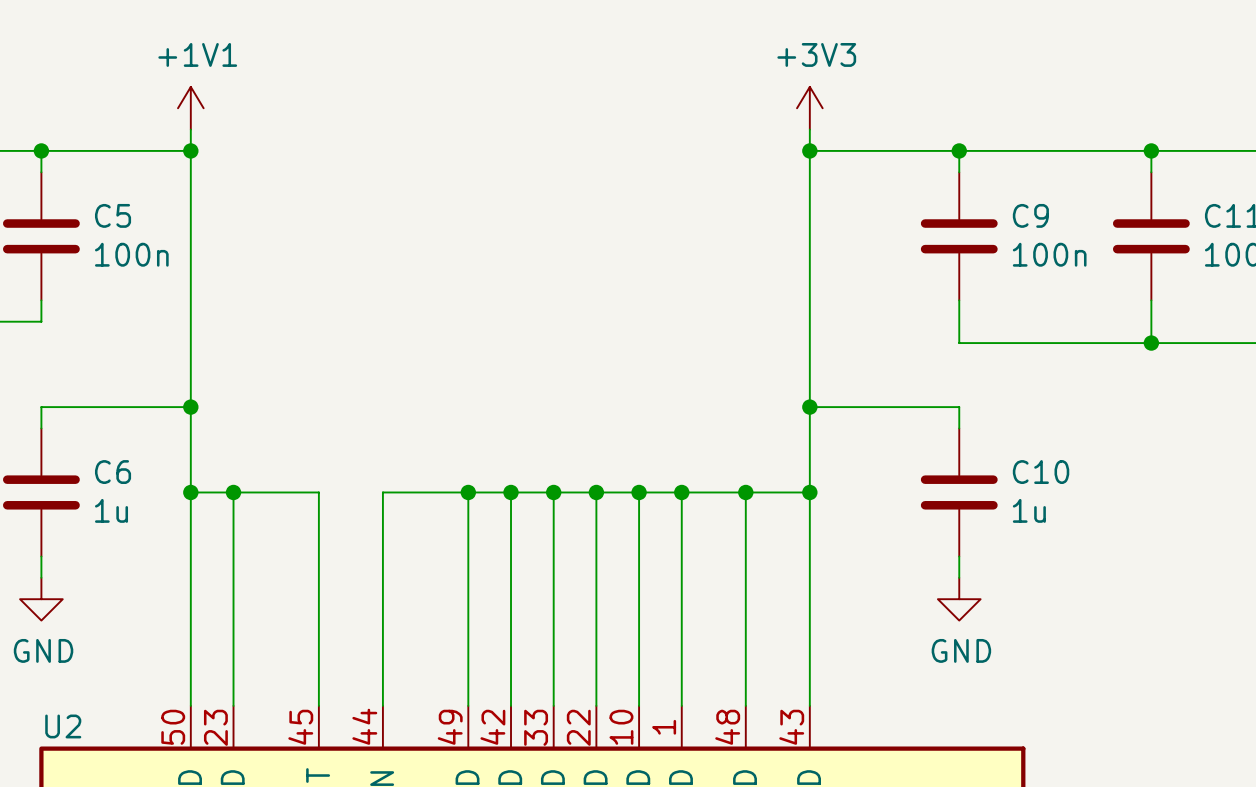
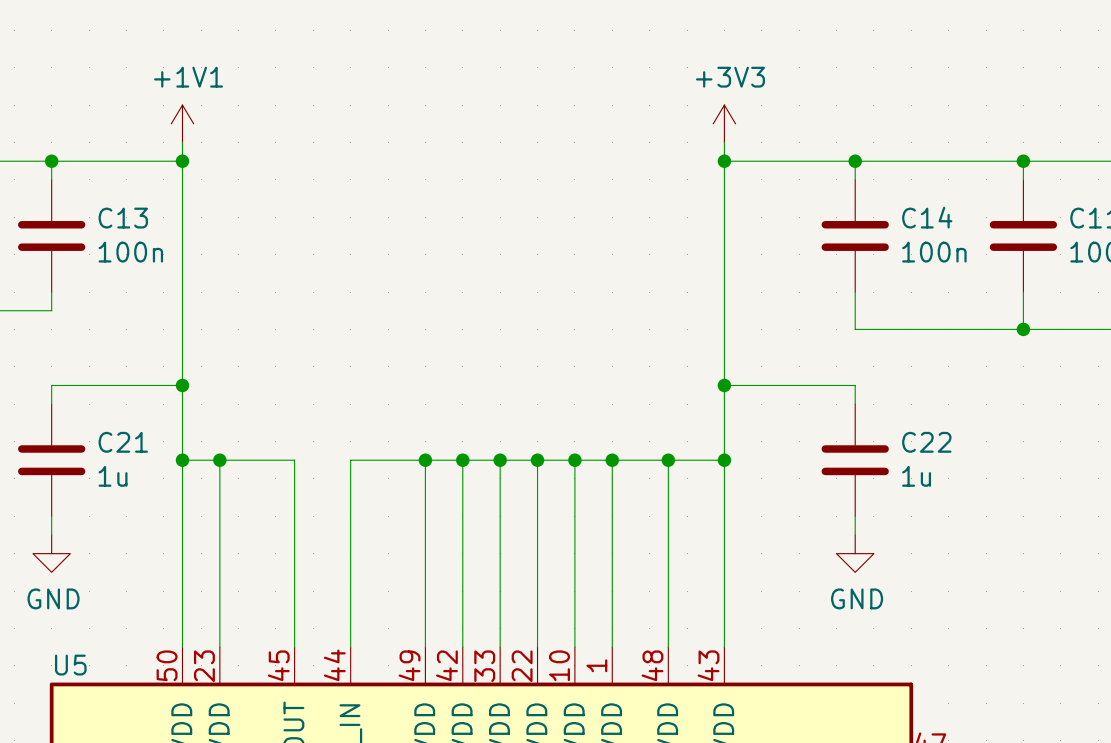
C5 name: C5 (113, 215) -> C13 (123, 218)
C9 name: C9 (1030, 215) -> C14 (927, 217)
C6 name: C6 (113, 472) -> C21 (123, 442)
C10 name: C10 (1041, 472) -> C22 (926, 442)
U2 name: U2 (63, 726) -> U5 (70, 665)

